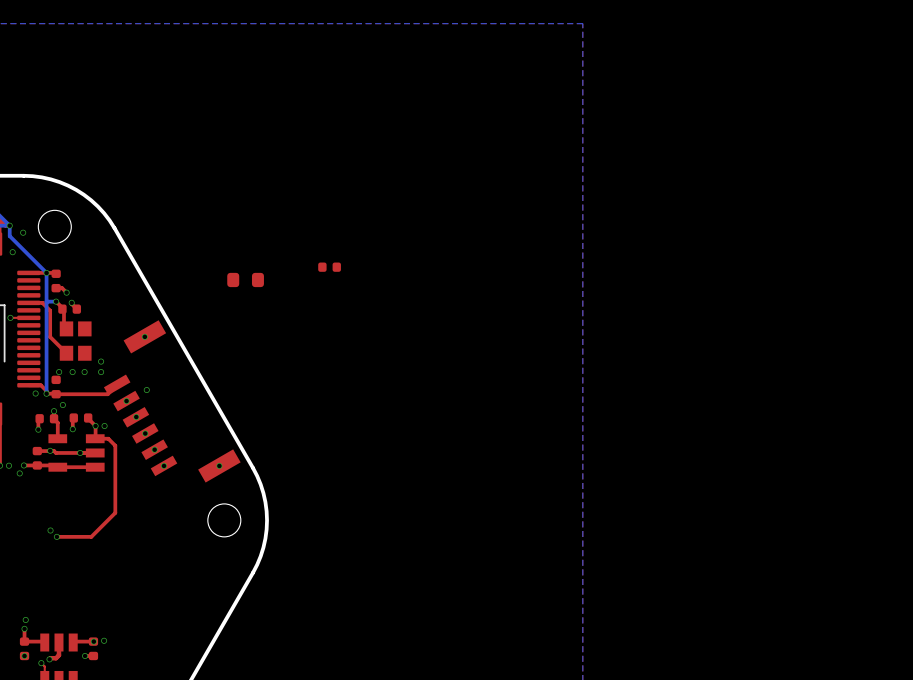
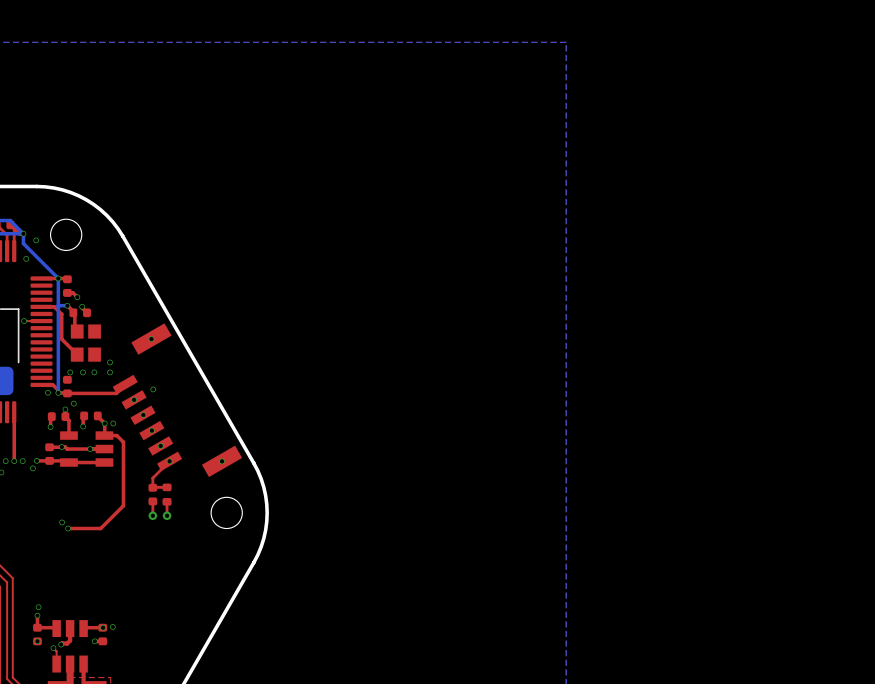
part rotation: 0° (329, 267) -> 90° clockwise (152, 494)
part position: (329, 267) -> (152, 494)
part: (245, 279) -> none
top track: none -> (169, 461) (152, 478) (152, 487) (167, 487)
part: none -> (167, 494)
top track: none -> (152, 501) (152, 515)
top track: none -> (167, 501) (167, 515)
via: none -> (152, 515)
via: none -> (167, 515)

